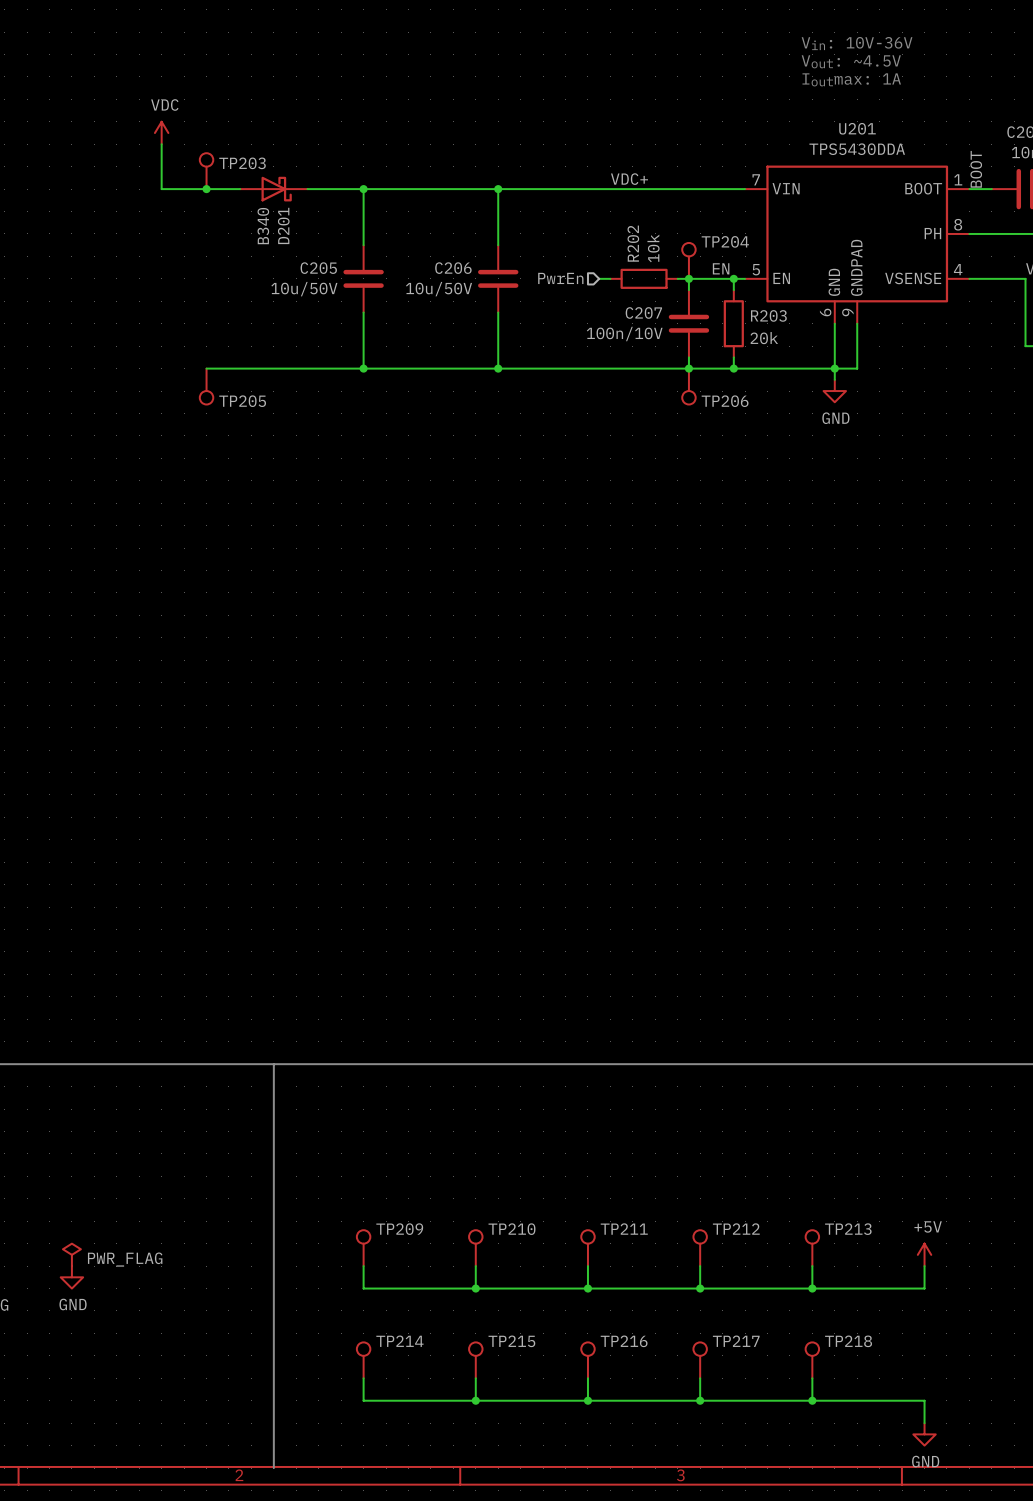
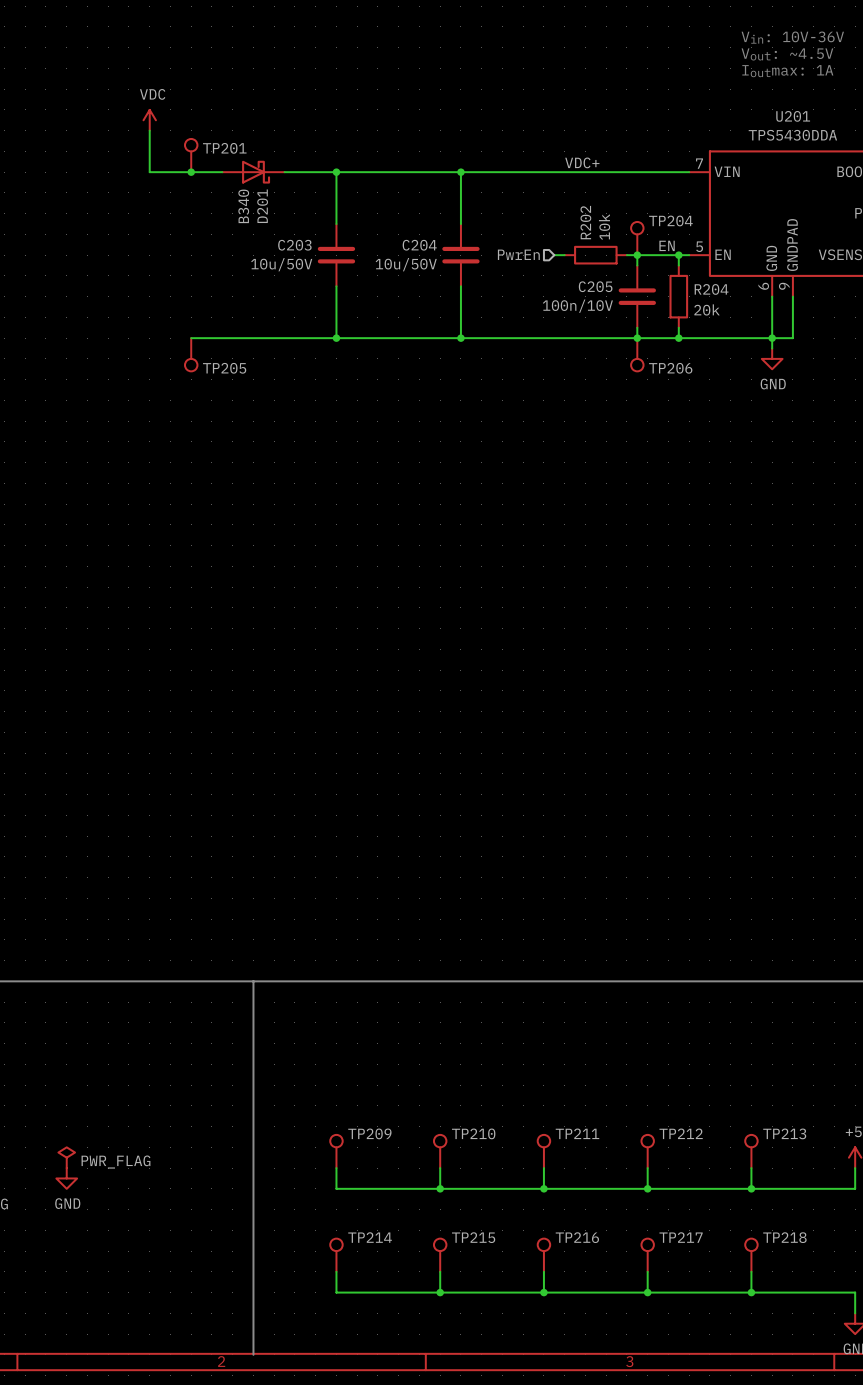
TP203 name: TP203 (242, 163) -> TP201 (224, 148)
C205 name: C205 (318, 268) -> C203 (294, 245)
C206 name: C206 (453, 268) -> C204 (419, 245)
C207 name: C207 (643, 312) -> C205 (595, 286)
R203 name: R203 (768, 315) -> R204 (711, 289)

